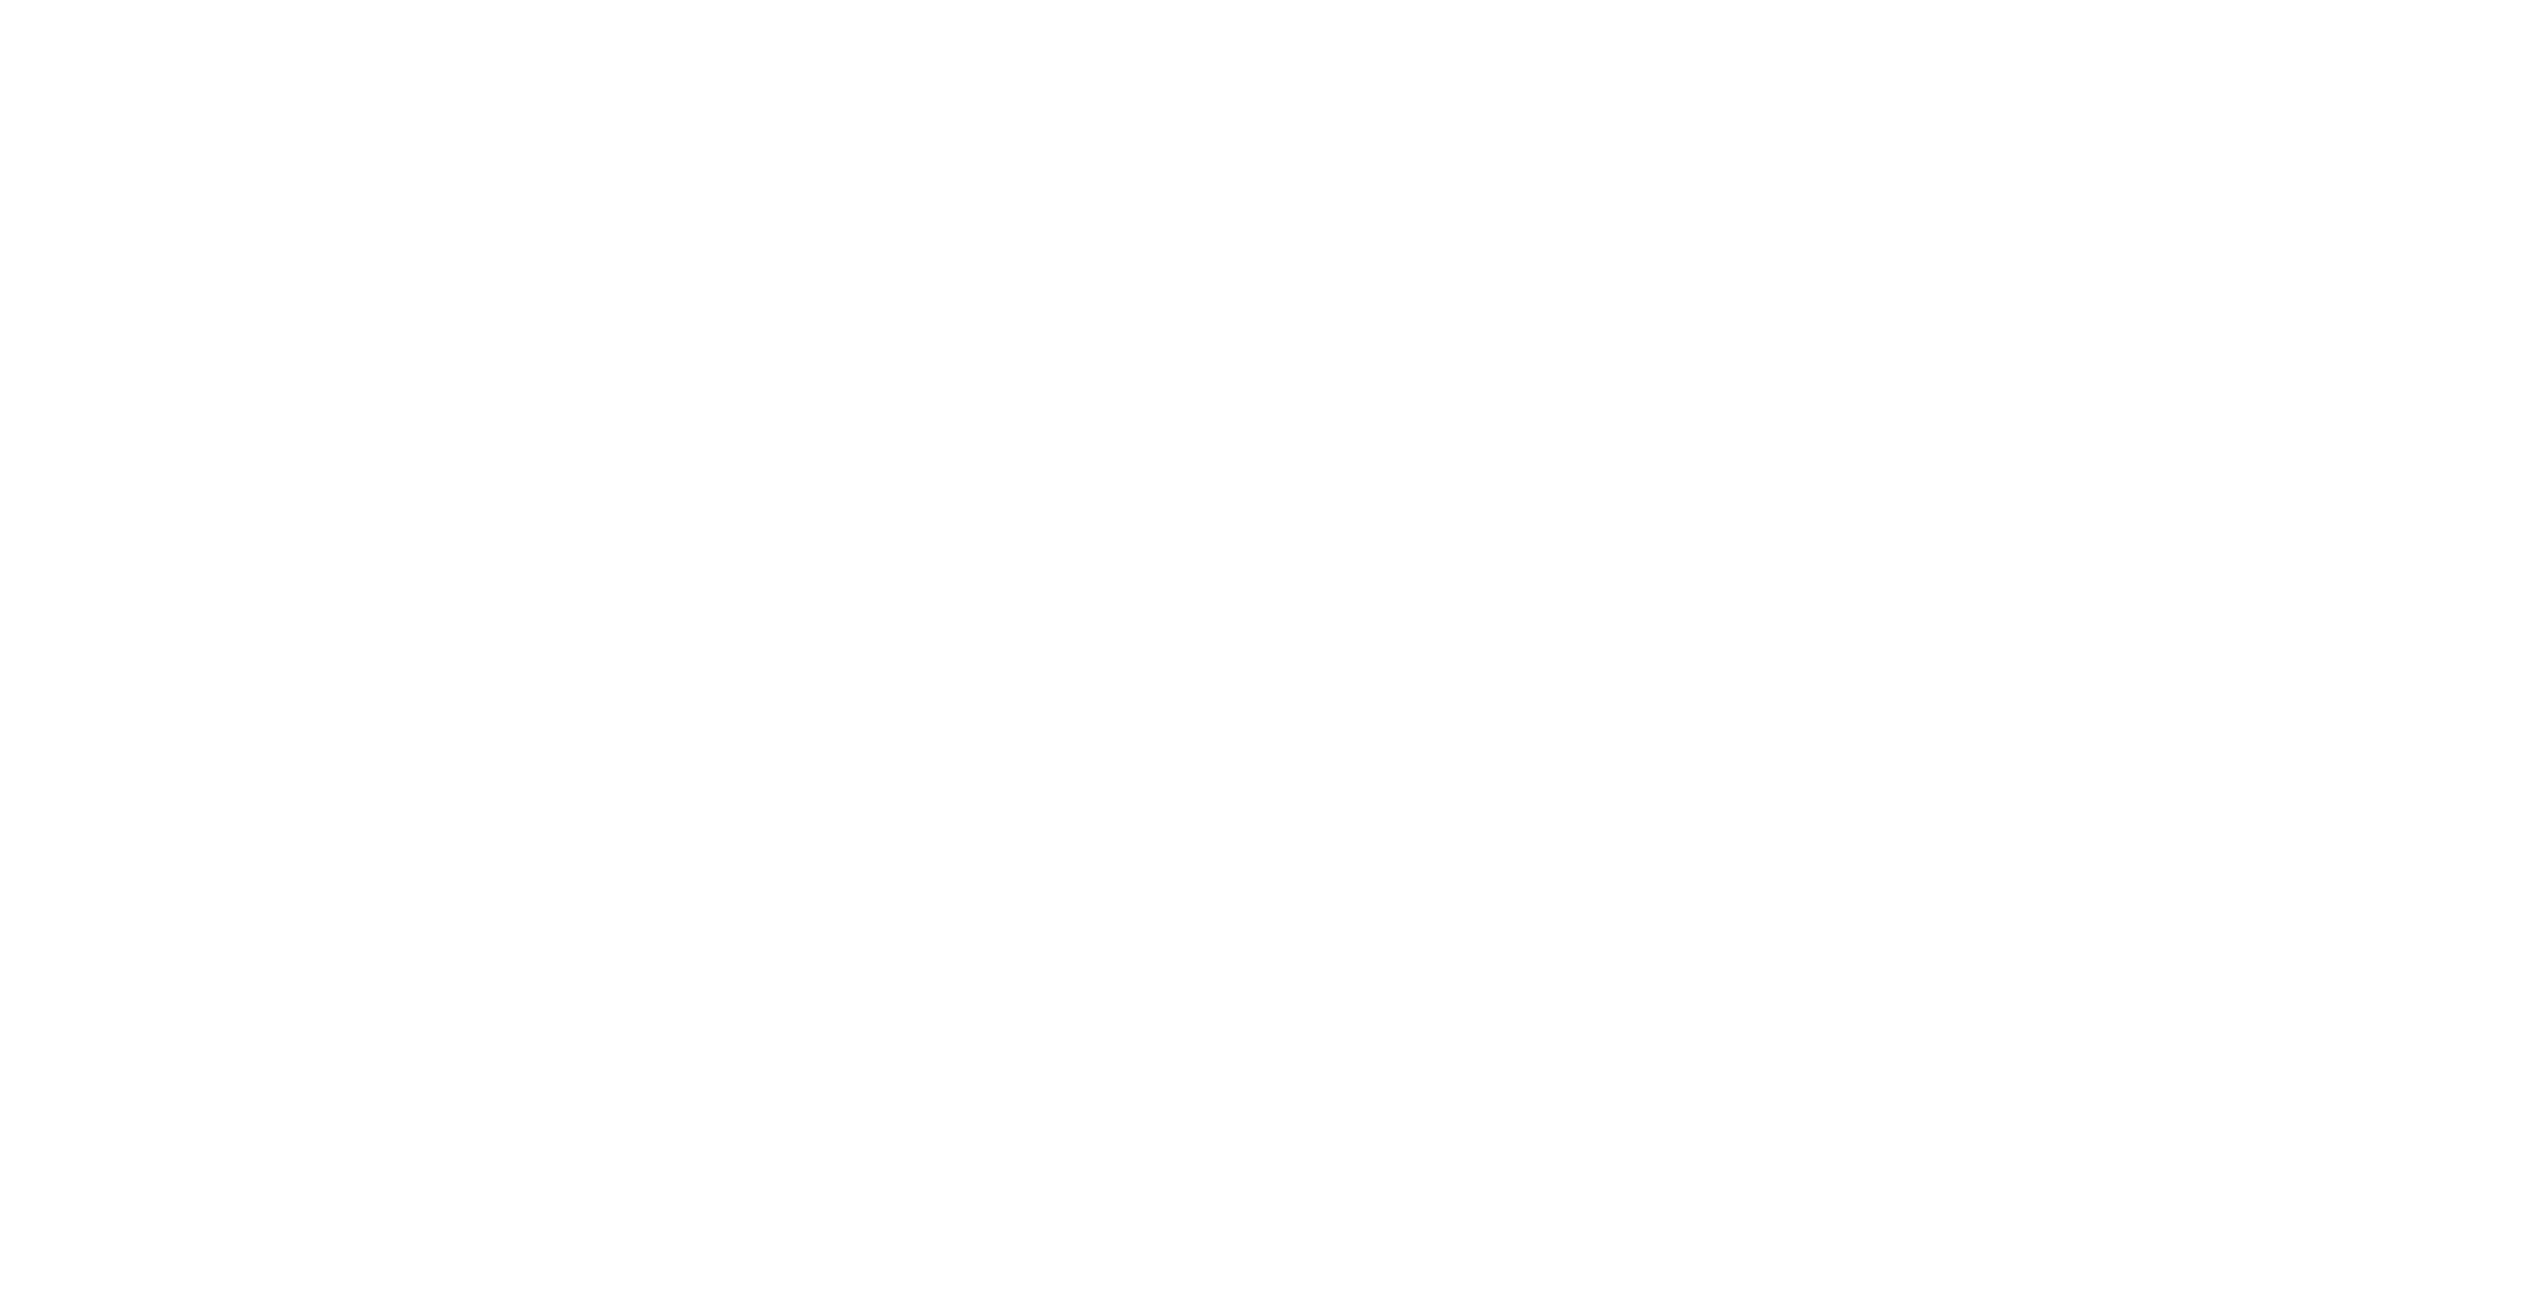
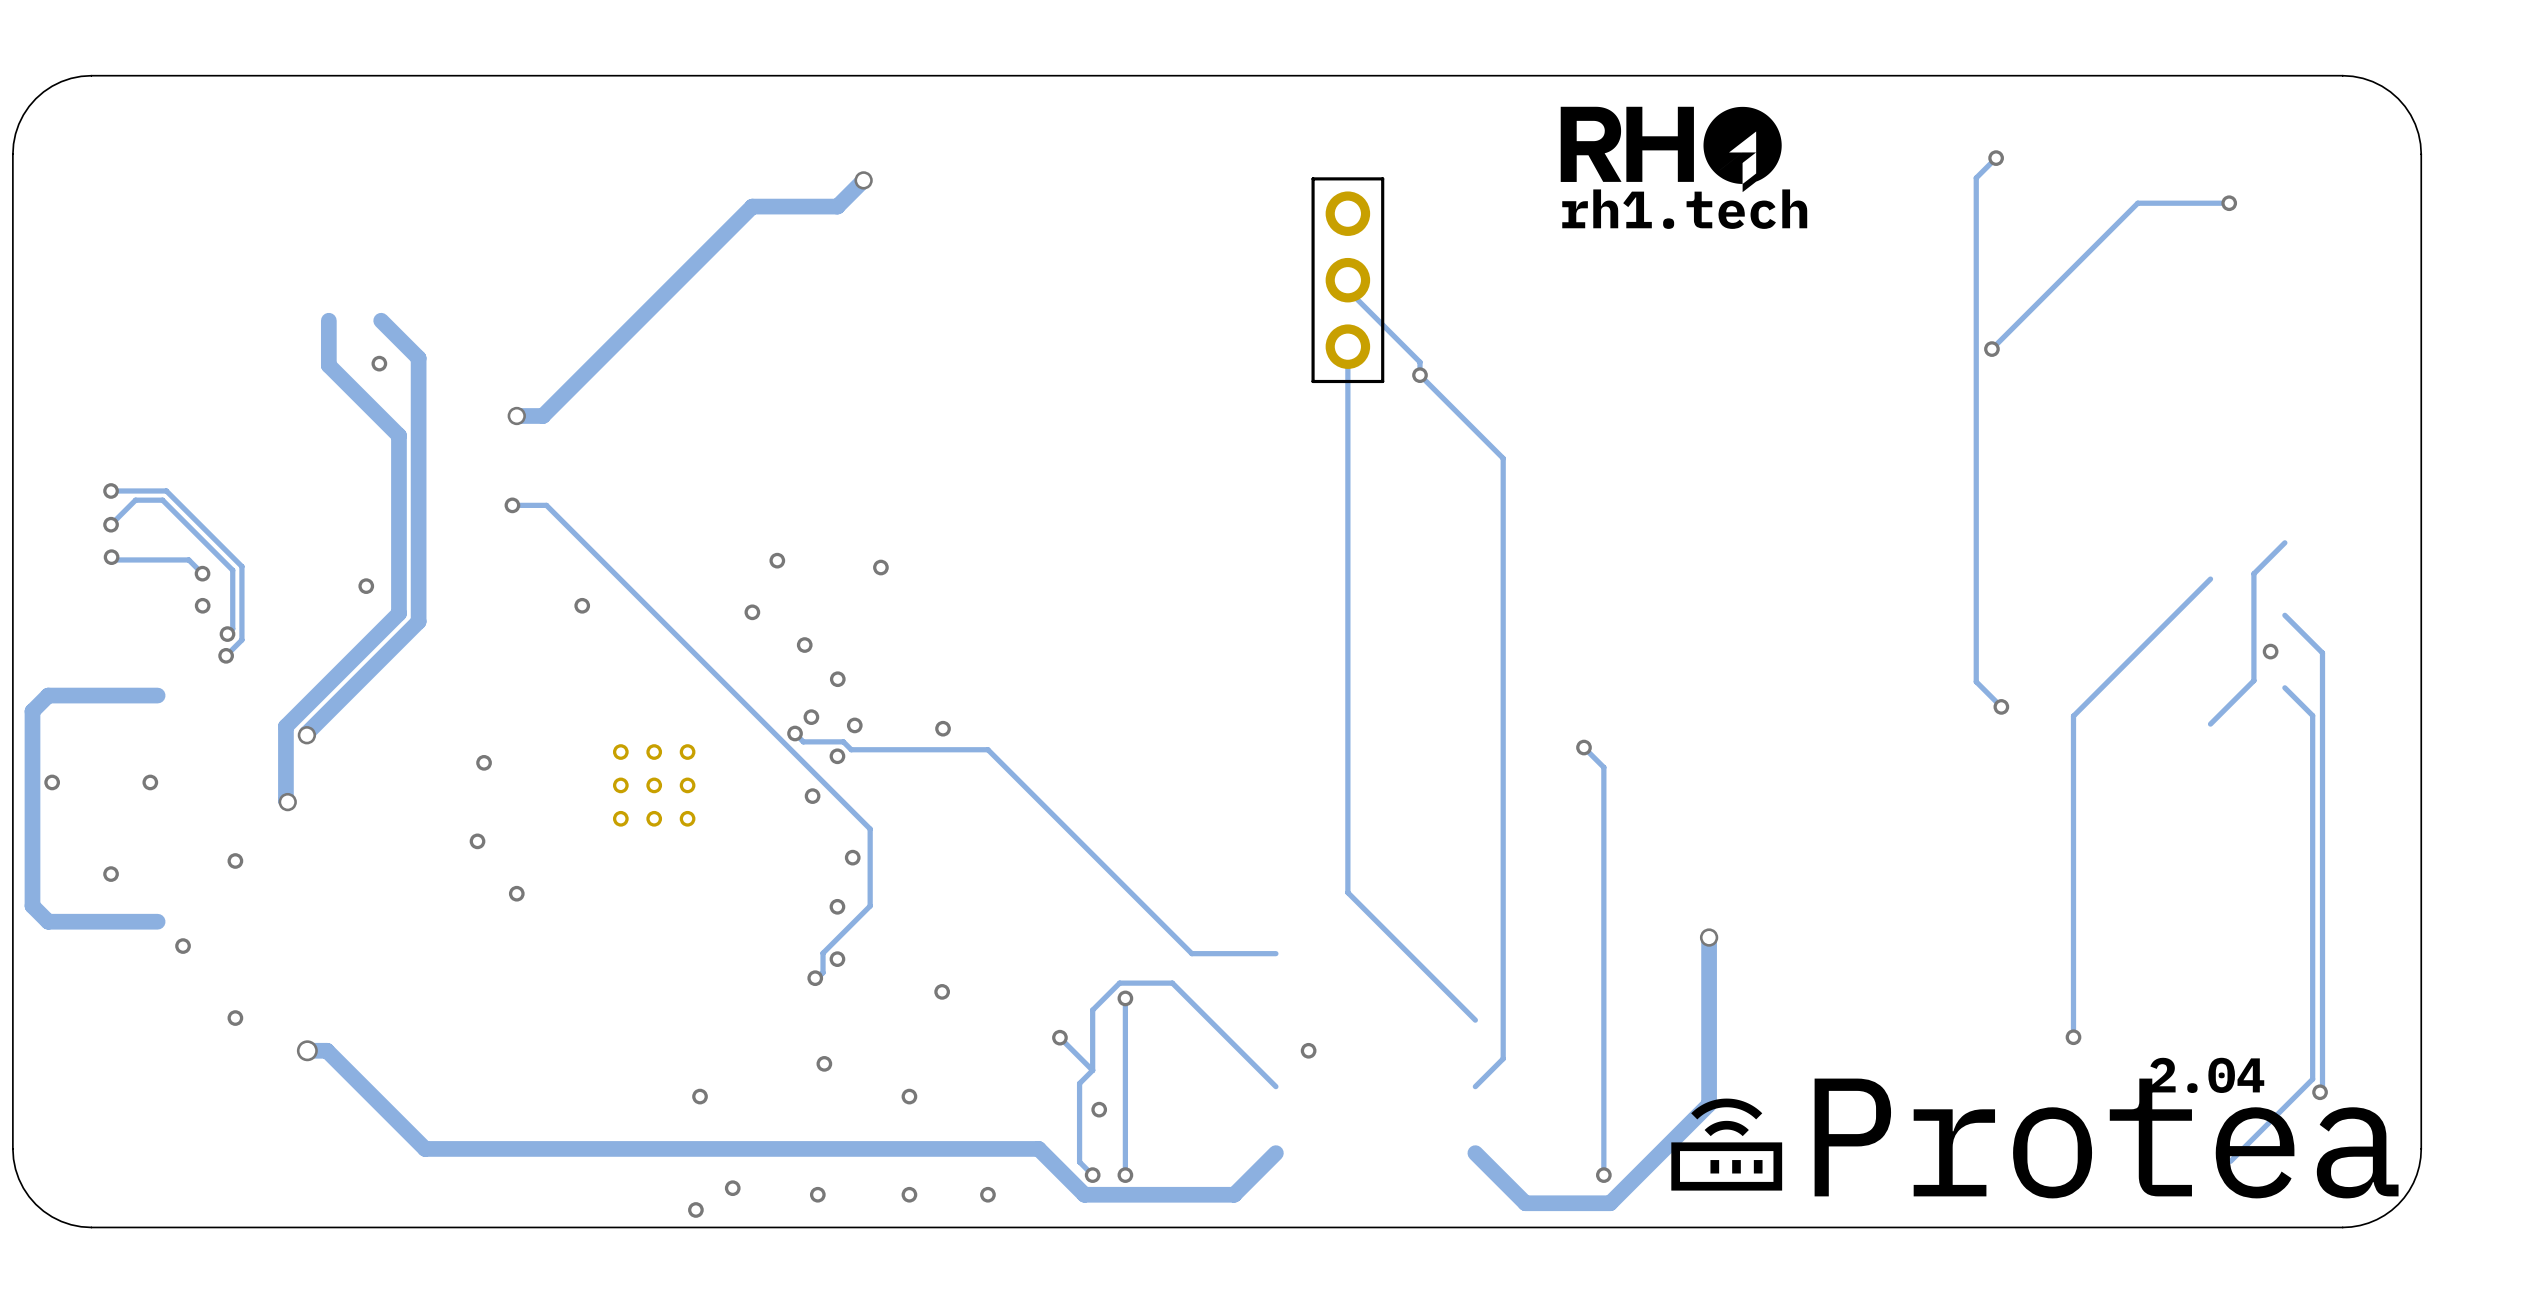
board edge: none -> (2342, 75) (91, 75) (61, 81) (43, 91) (29, 106) (18, 124) (12, 154) (12, 1148) (18, 1178) (29, 1196) (52, 1216) (71, 1224) (91, 1227) (2342, 1227) (2360, 1225) (2376, 1219) (2398, 1204) (2409, 1190) (2419, 1166) (2421, 1148) (2421, 154) (2415, 124) (2398, 98) (2372, 81) (2342, 75)
drawing: none -> [1560, 106, 1782, 193]
track: none -> (1996, 158) (1976, 177) (1976, 681) (2001, 706)
via: none -> (1996, 158)
track: none -> (863, 180) (837, 206) (752, 206) (542, 415) (516, 415)
via: none -> (863, 180)
track: none -> (2229, 203) (2137, 203) (1991, 349)
via: none -> (2229, 203)
text: none -> rh1.tech (1684, 209)
track: none -> (1347, 280) (1353, 286) (1353, 296) (1419, 362) (1419, 375) (1503, 458) (1503, 1058) (1475, 1086)
part: none -> (1347, 280)
track: none -> (328, 320) (328, 365) (398, 435) (398, 613) (285, 726) (285, 800) (287, 802)
track: none -> (381, 320) (418, 358) (418, 621) (306, 735)
track: none -> (1347, 346) (1347, 892) (1475, 1020)
via: none -> (1991, 349)
via: none -> (379, 363)
via: none -> (1419, 375)
via: none -> (516, 415)
track: none -> (111, 490) (166, 490) (241, 566) (241, 640) (226, 655)
via: none -> (111, 490)
track: none -> (512, 505) (546, 505) (870, 829) (870, 906) (823, 953) (823, 972) (815, 978)
via: none -> (512, 505)
track: none -> (111, 524) (135, 500) (162, 500) (232, 570) (232, 628) (227, 634)
via: none -> (111, 524)
track: none -> (2284, 542) (2253, 573) (2253, 680) (2210, 724)
track: none -> (111, 557) (114, 559) (188, 559) (202, 573)
via: none -> (111, 557)
via: none -> (777, 560)
via: none -> (880, 567)
via: none -> (202, 573)
track: none -> (2210, 579) (2073, 716) (2073, 1037)
via: none -> (366, 586)
via: none -> (202, 605)
via: none -> (582, 605)
via: none -> (752, 612)
track: none -> (2284, 615) (2322, 652) (2322, 1089) (2320, 1092)
via: none -> (227, 634)
via: none -> (804, 645)
via: none -> (2270, 651)
via: none -> (226, 655)
via: none -> (837, 679)
track: none -> (2284, 687) (2312, 715) (2312, 1079) (2230, 1161)
track: none -> (157, 695) (48, 695) (32, 711) (32, 905) (48, 921) (157, 921)
via: none -> (2001, 706)
via: none -> (811, 717)
via: none -> (854, 725)
via: none -> (943, 728)
track: none -> (795, 733) (803, 741) (843, 741) (851, 749) (987, 749) (1191, 953) (1275, 953)
via: none -> (795, 733)
via: none -> (306, 735)
track: none -> (1583, 747) (1603, 767) (1603, 1175)
via: none -> (1583, 747)
via: none -> (837, 756)
via: none -> (484, 762)
via: none -> (52, 782)
via: none -> (150, 782)
part: none -> (654, 785)
via: none -> (812, 796)
via: none -> (287, 802)
via: none -> (477, 841)
via: none -> (852, 857)
via: none -> (235, 860)
via: none -> (111, 874)
via: none -> (516, 893)
via: none -> (837, 906)
track: none -> (1709, 937) (1709, 1104) (1610, 1203) (1525, 1203) (1475, 1153)
via: none -> (1709, 937)
via: none -> (183, 946)
via: none -> (837, 959)
via: none -> (815, 978)
via: none -> (942, 991)
track: none -> (1125, 998) (1125, 1175)
via: none -> (1125, 998)
via: none -> (235, 1018)
track: none -> (1059, 1037) (1092, 1070)
via: none -> (1059, 1037)
via: none -> (2073, 1037)
track: none -> (307, 1050) (327, 1050) (425, 1148) (1038, 1148) (1084, 1194) (1234, 1194) (1275, 1153)
via: none -> (307, 1050)
via: none -> (1308, 1050)
via: none -> (824, 1063)
track: none -> (1092, 1070) (1092, 1010) (1119, 983) (1172, 983) (1275, 1086)
track: none -> (1092, 1070) (1079, 1083) (1079, 1162) (1092, 1175)
text: none -> 2.04 (2207, 1075)
via: none -> (2320, 1092)
via: none -> (700, 1096)
via: none -> (909, 1096)
drawing: none -> [1671, 1098, 1783, 1191]
via: none -> (1099, 1109)
text: none -> Protea (2106, 1138)
via: none -> (1092, 1175)
via: none -> (1125, 1175)
via: none -> (1603, 1175)
via: none -> (732, 1188)
via: none -> (817, 1194)
via: none -> (909, 1194)
via: none -> (987, 1194)
via: none -> (695, 1209)

